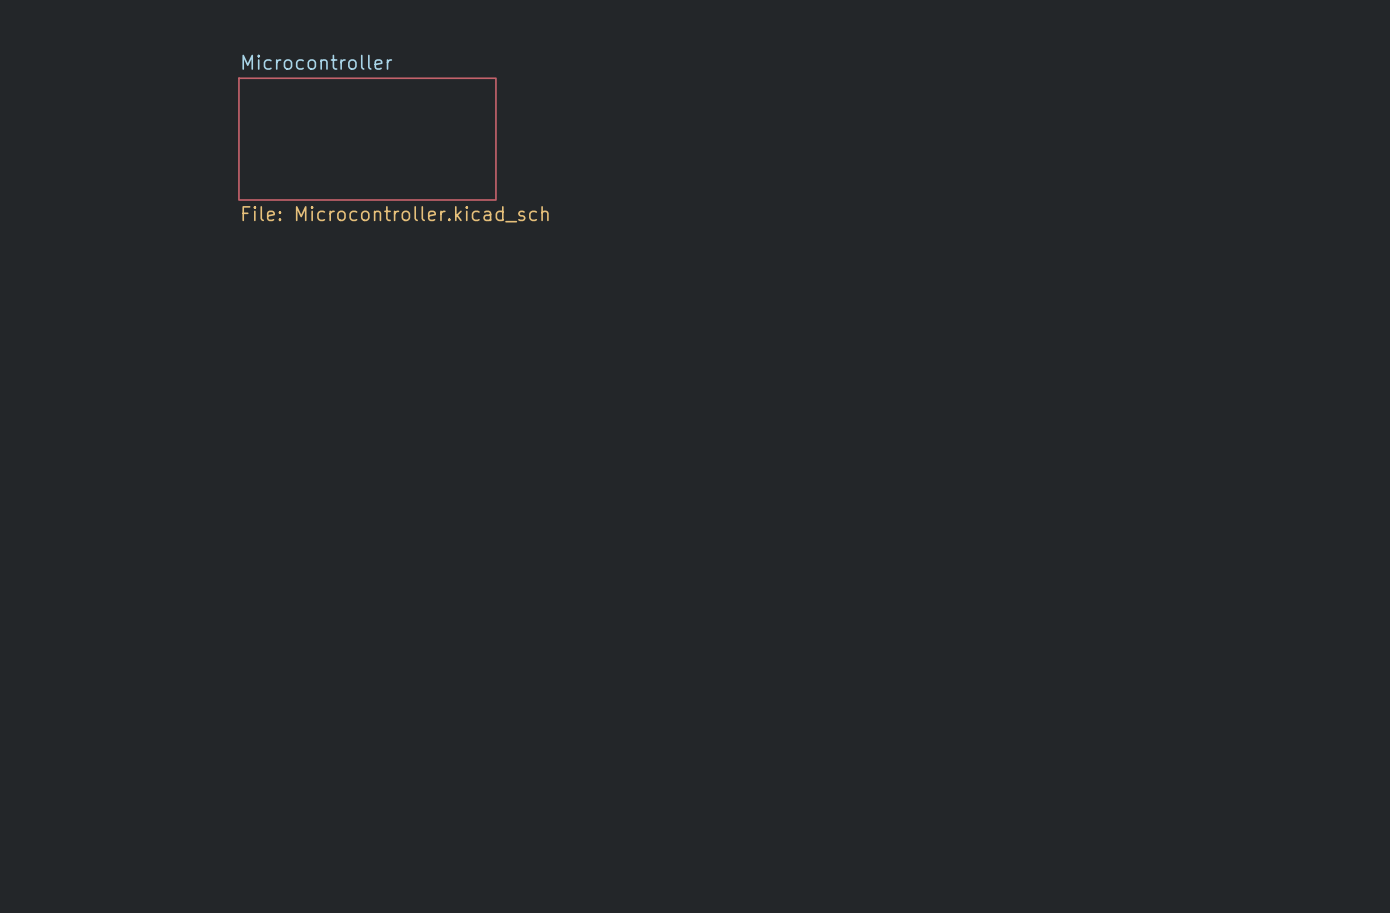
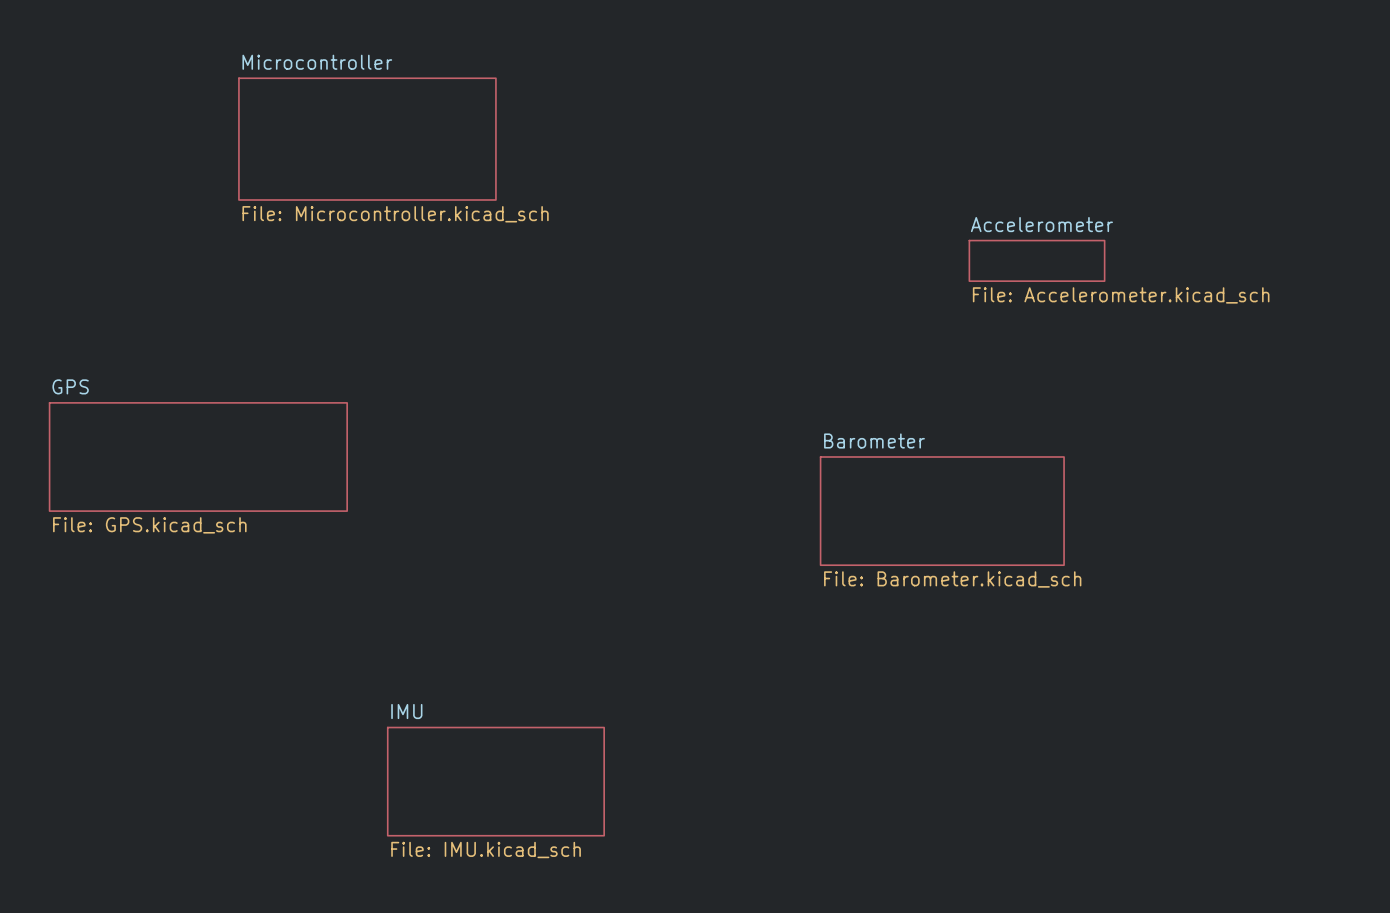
sheet Accelerometer: none -> File: Accelerometer.kicad_sch (1037, 260)
sheet GPS: none -> File: GPS.kicad_sch (198, 456)
sheet Barometer: none -> File: Barometer.kicad_sch (942, 511)
sheet IMU: none -> File: IMU.kicad_sch (495, 781)

